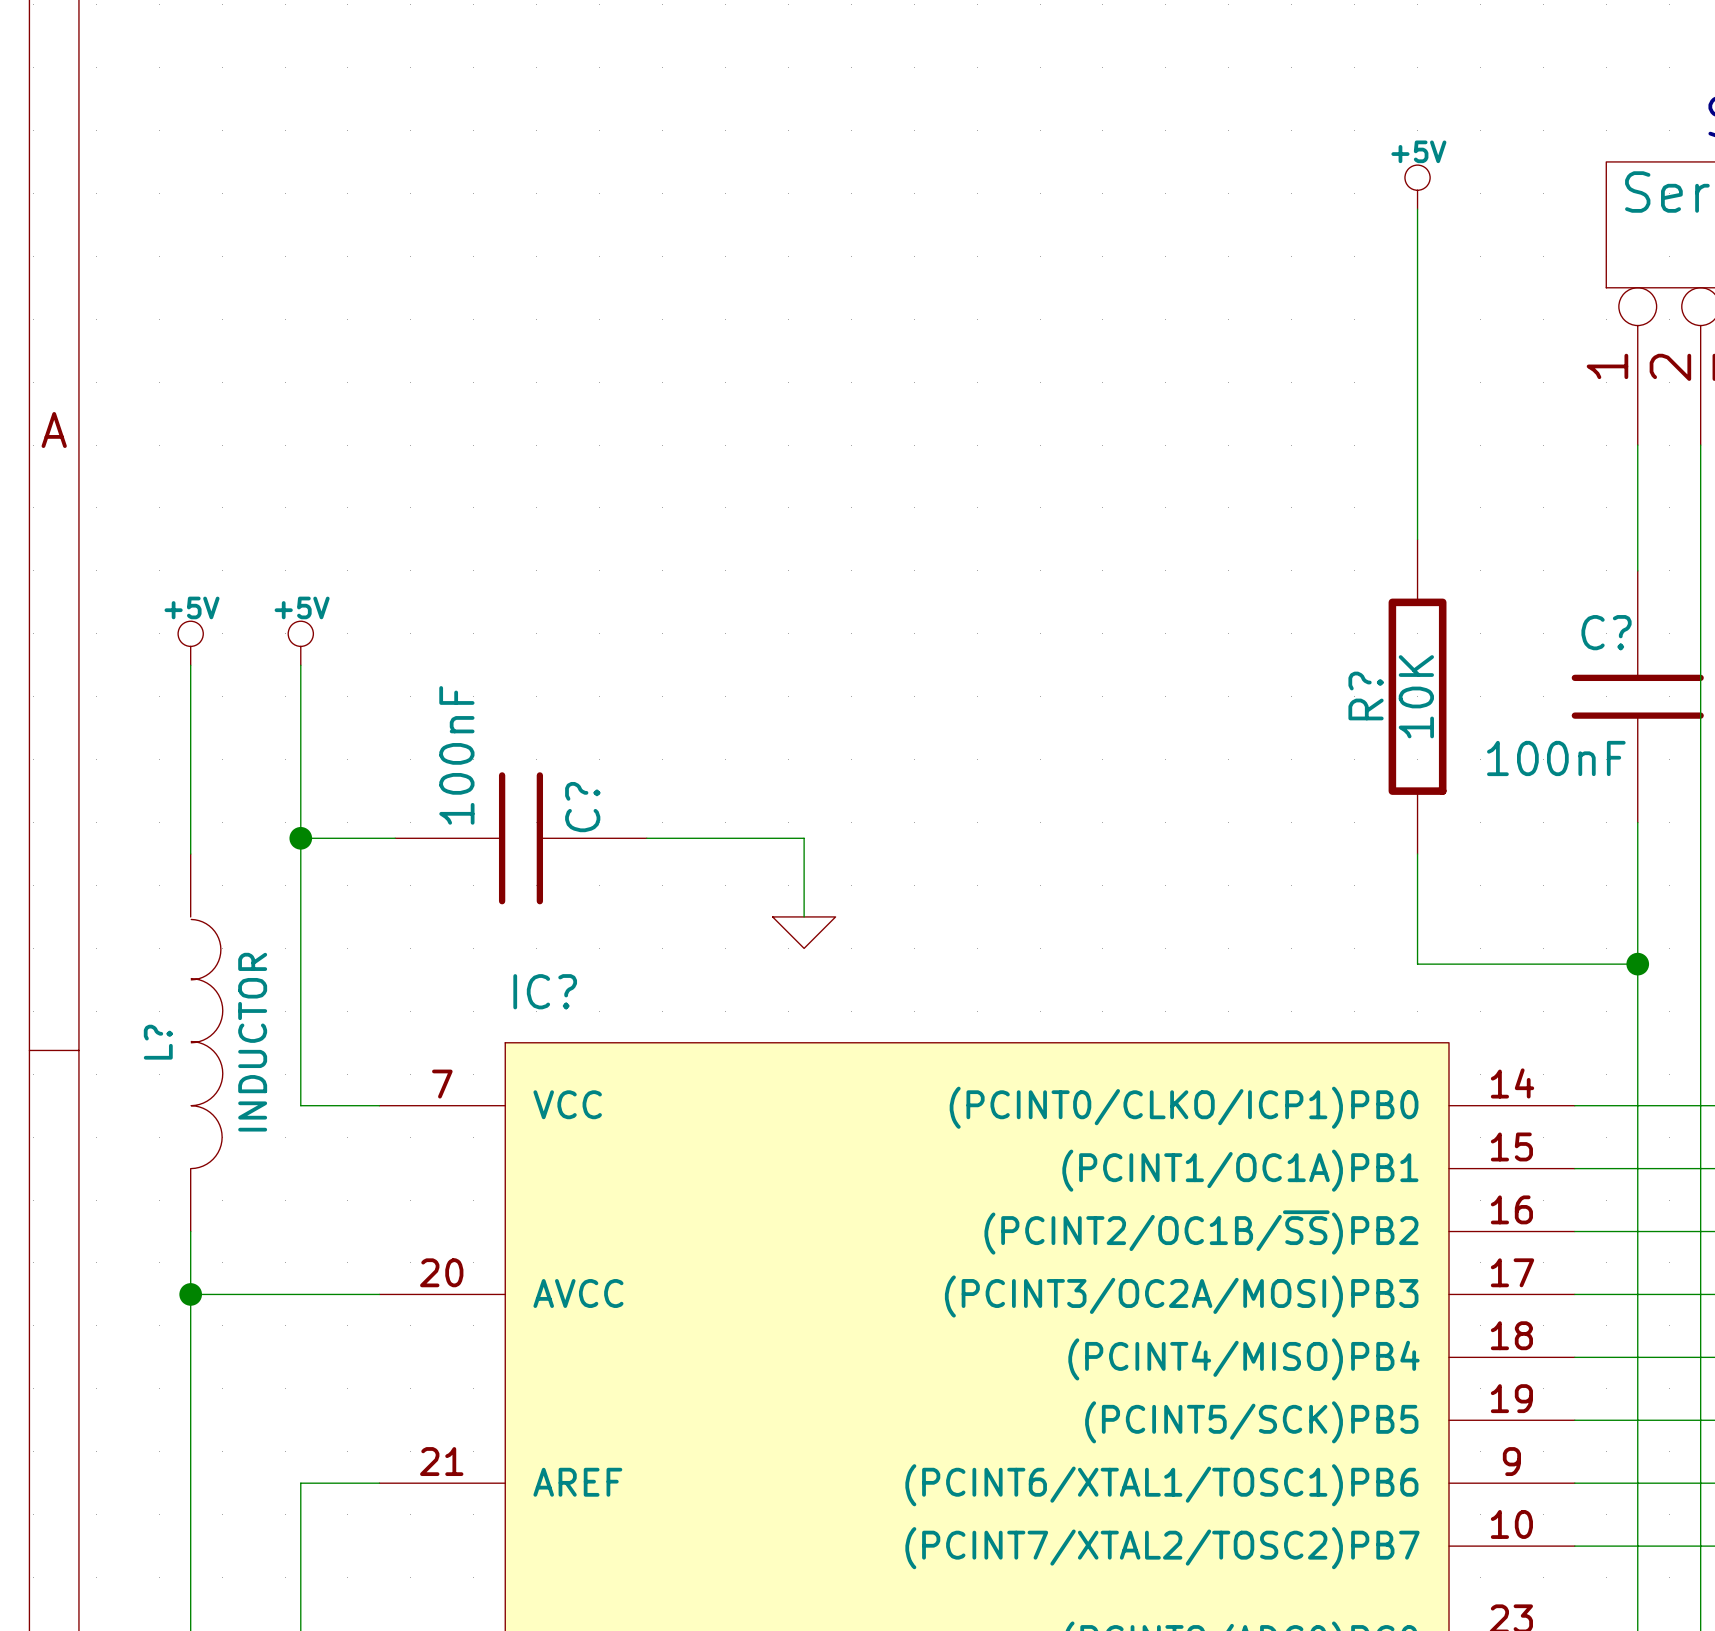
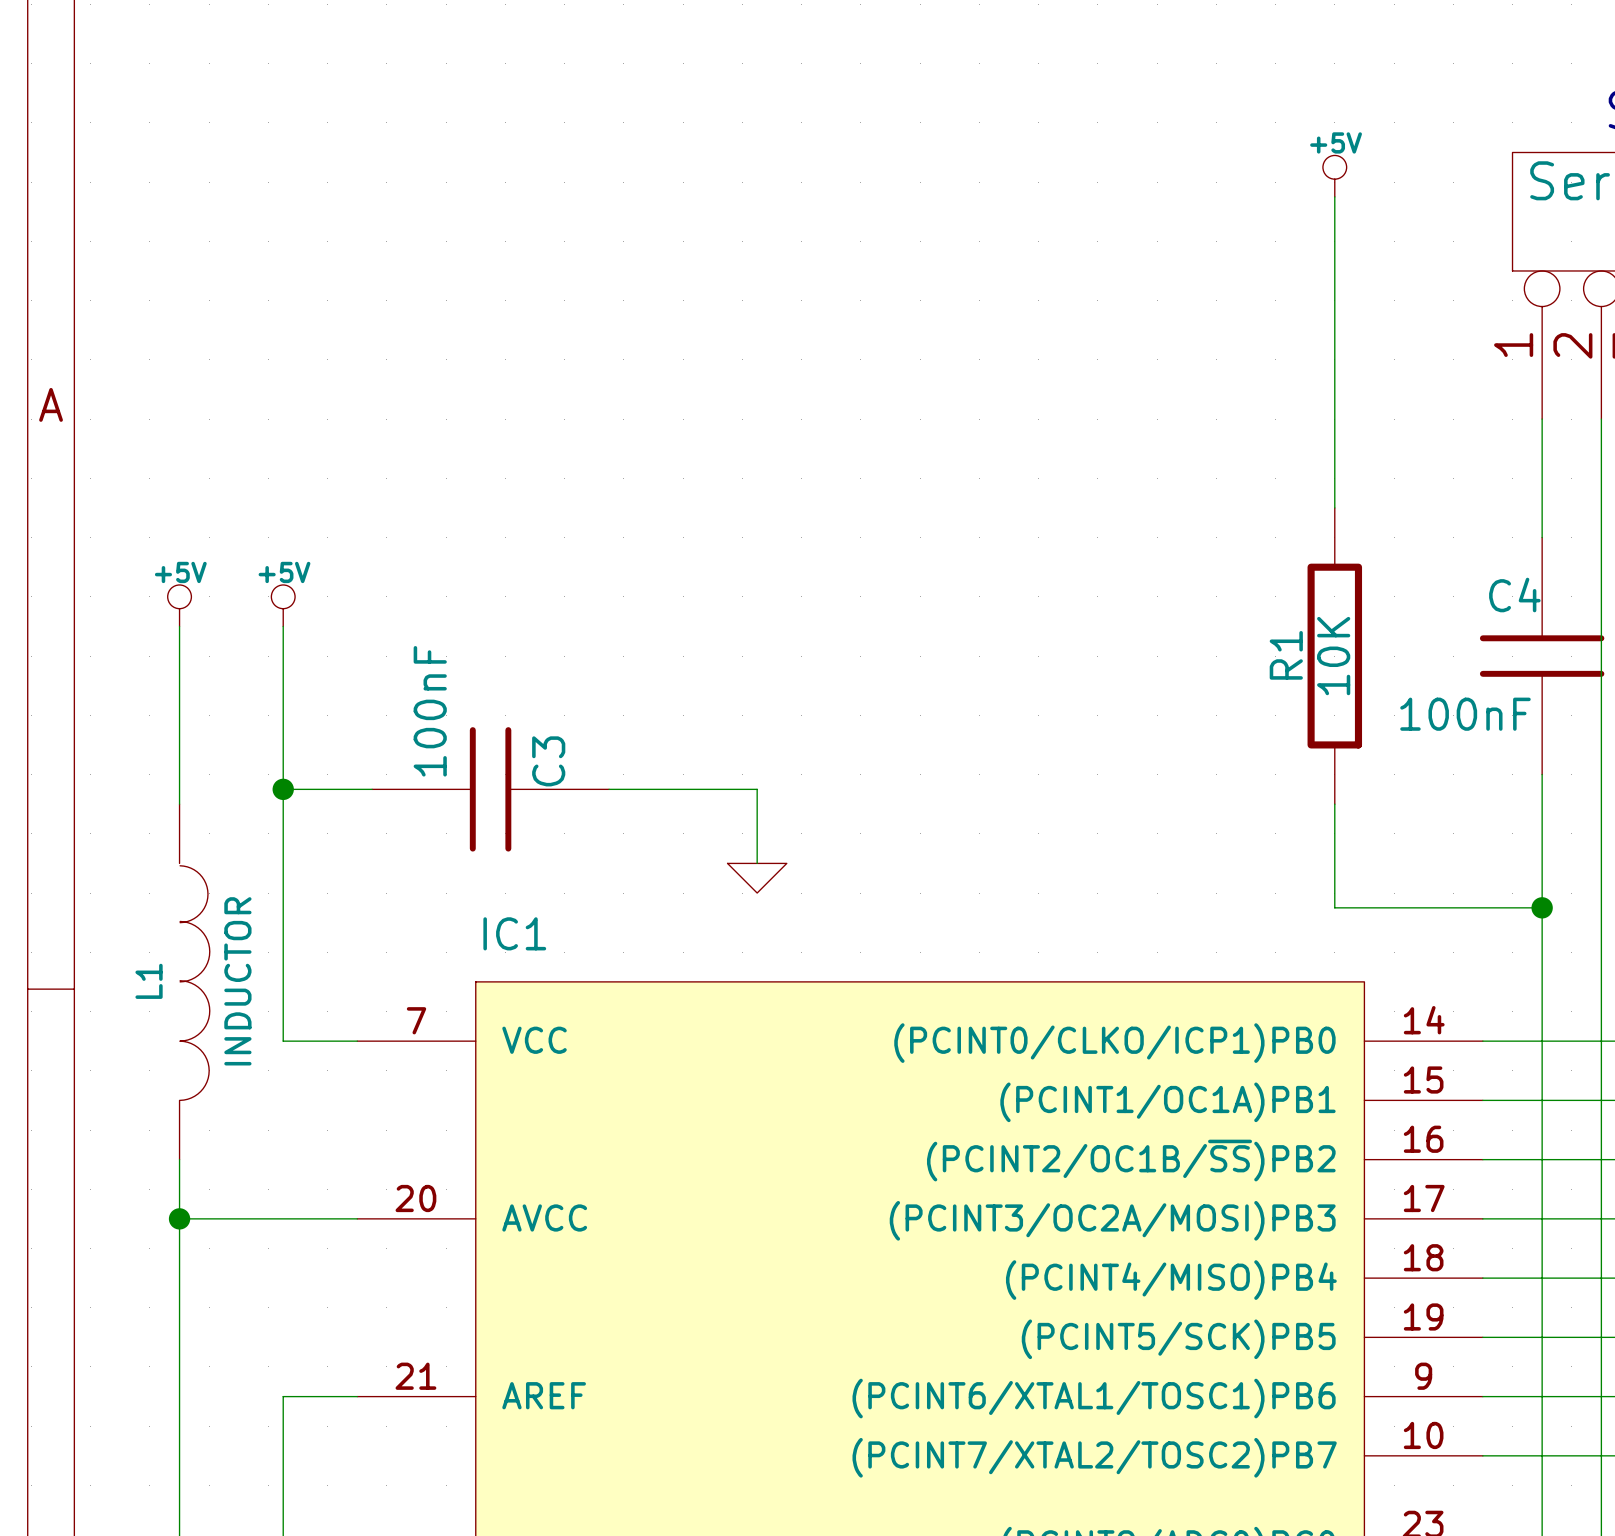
C? name: C? (1606, 632) -> C4 (1514, 595)
R? name: R? (1366, 695) -> R1 (1286, 655)
C? name: C? (582, 807) -> C3 (548, 761)
IC? name: IC? (545, 991) -> IC1 (514, 933)
L? name: L? (158, 1042) -> L1 (149, 981)

